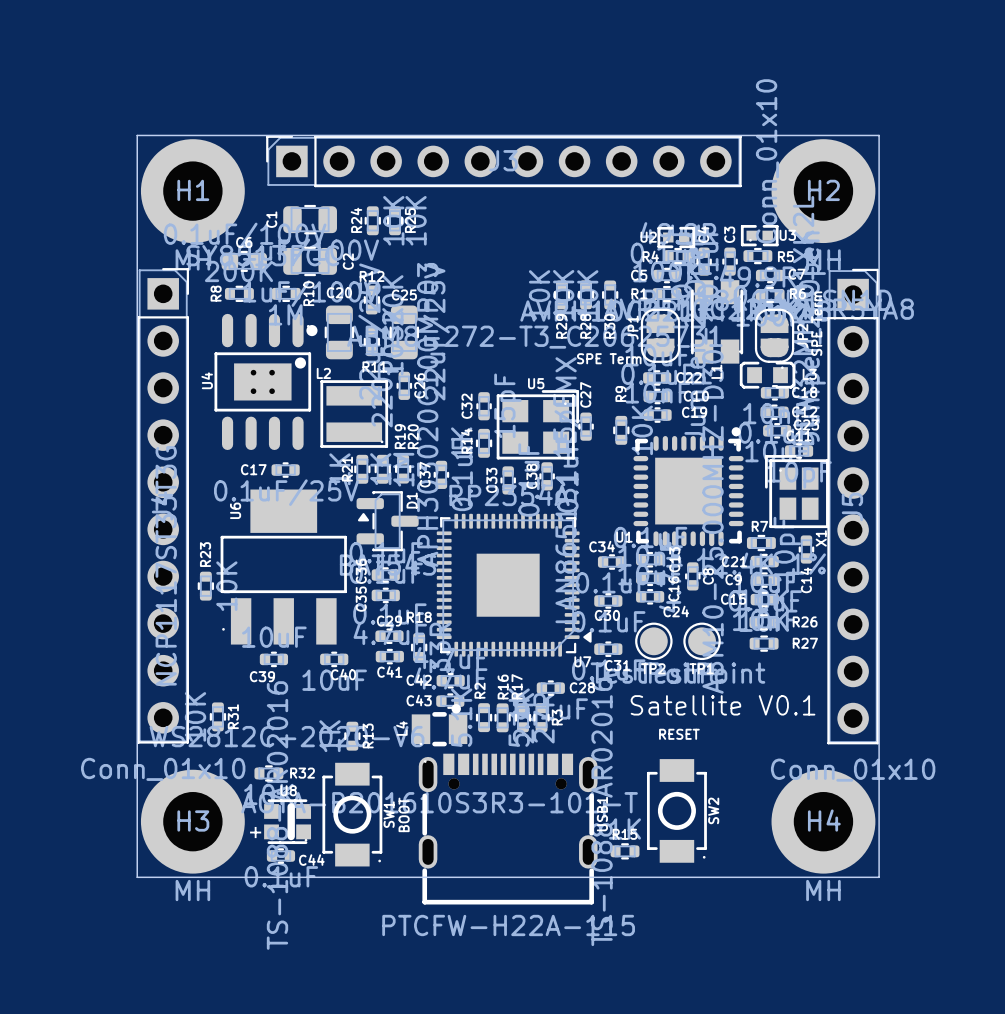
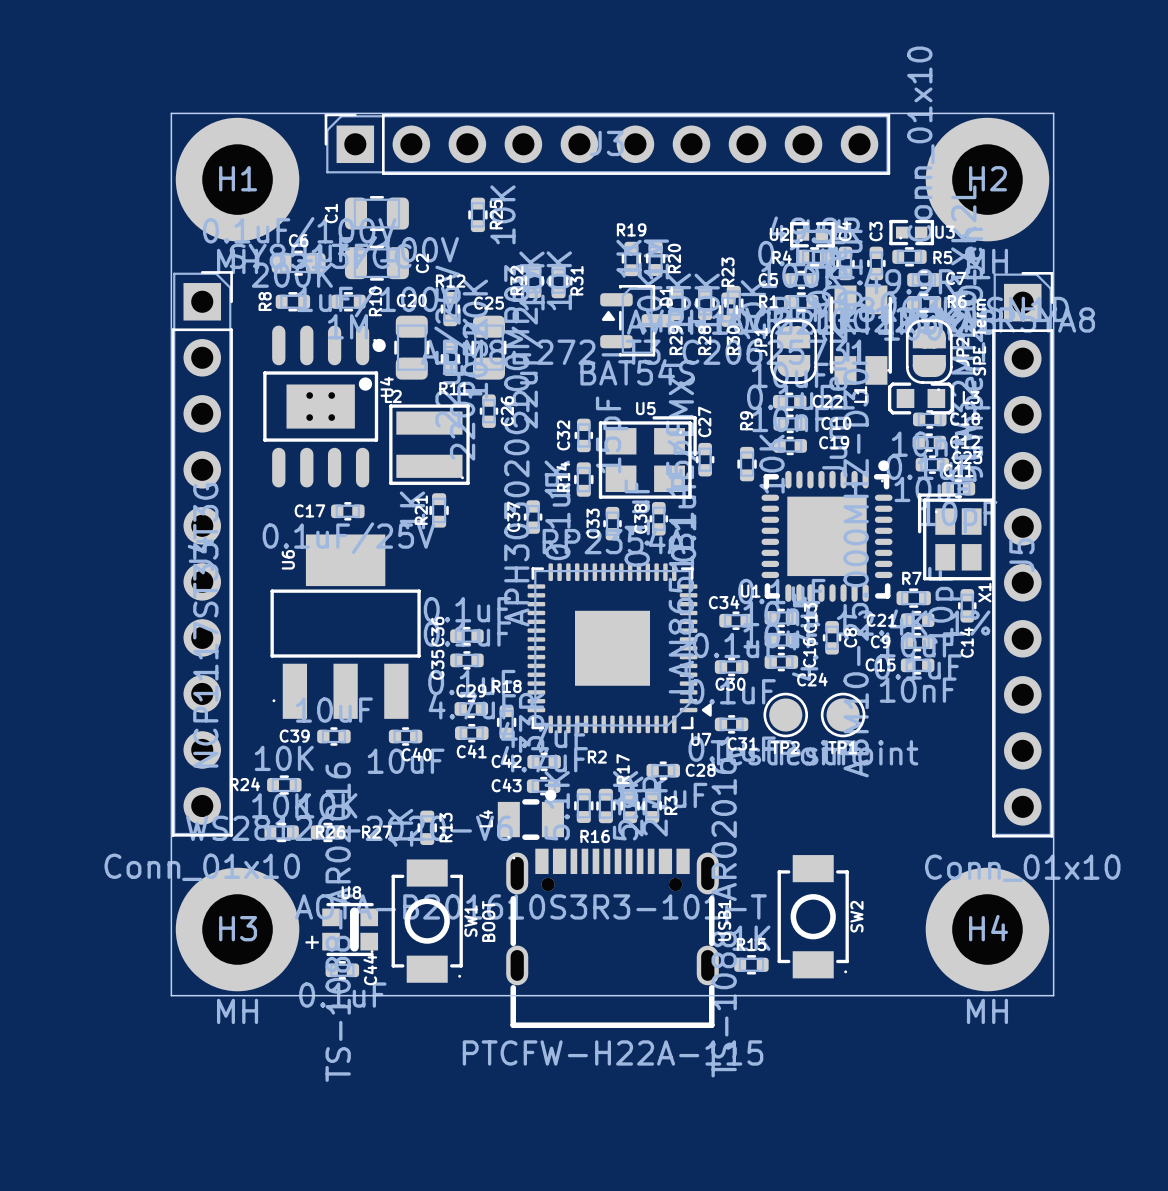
R24 rotation: 0° (372, 220) -> 90° clockwise (284, 785)
R24 position: (372, 220) -> (284, 785)
text: SPE Term (609, 358) -> none
U4 name position: U4 (207, 380) -> U4 (386, 386)
R19 name rotation: 0° (400, 436) -> 90° clockwise (631, 229)
R20 name position: R20 (413, 436) -> R20 (674, 258)
R19 position: (382, 469) -> (631, 258)
R20 position: (403, 469) -> (655, 258)
D1 position: (387, 521) -> (637, 320)
R23 position: (205, 586) -> (728, 309)
R26 position: (763, 622) -> (281, 832)
R27 position: (764, 643) -> (327, 832)
C39 name position: C39 (262, 676) -> C39 (294, 736)
R16 name rotation: 0° (503, 686) -> 90° clockwise (595, 836)
R16 name position: R16 (503, 686) -> R16 (595, 836)
R2 name rotation: 0° (480, 690) -> 90° clockwise (597, 757)
text: Satellite V0.1 (723, 705) -> none
R31 position: (217, 716) -> (558, 281)
text: RESET (679, 734) -> none
R32 rotation: 0° (268, 773) -> 90° clockwise (534, 280)
R32 position: (268, 773) -> (534, 280)
C44 name rotation: 0° (311, 860) -> 90° counterclockwise (370, 970)

